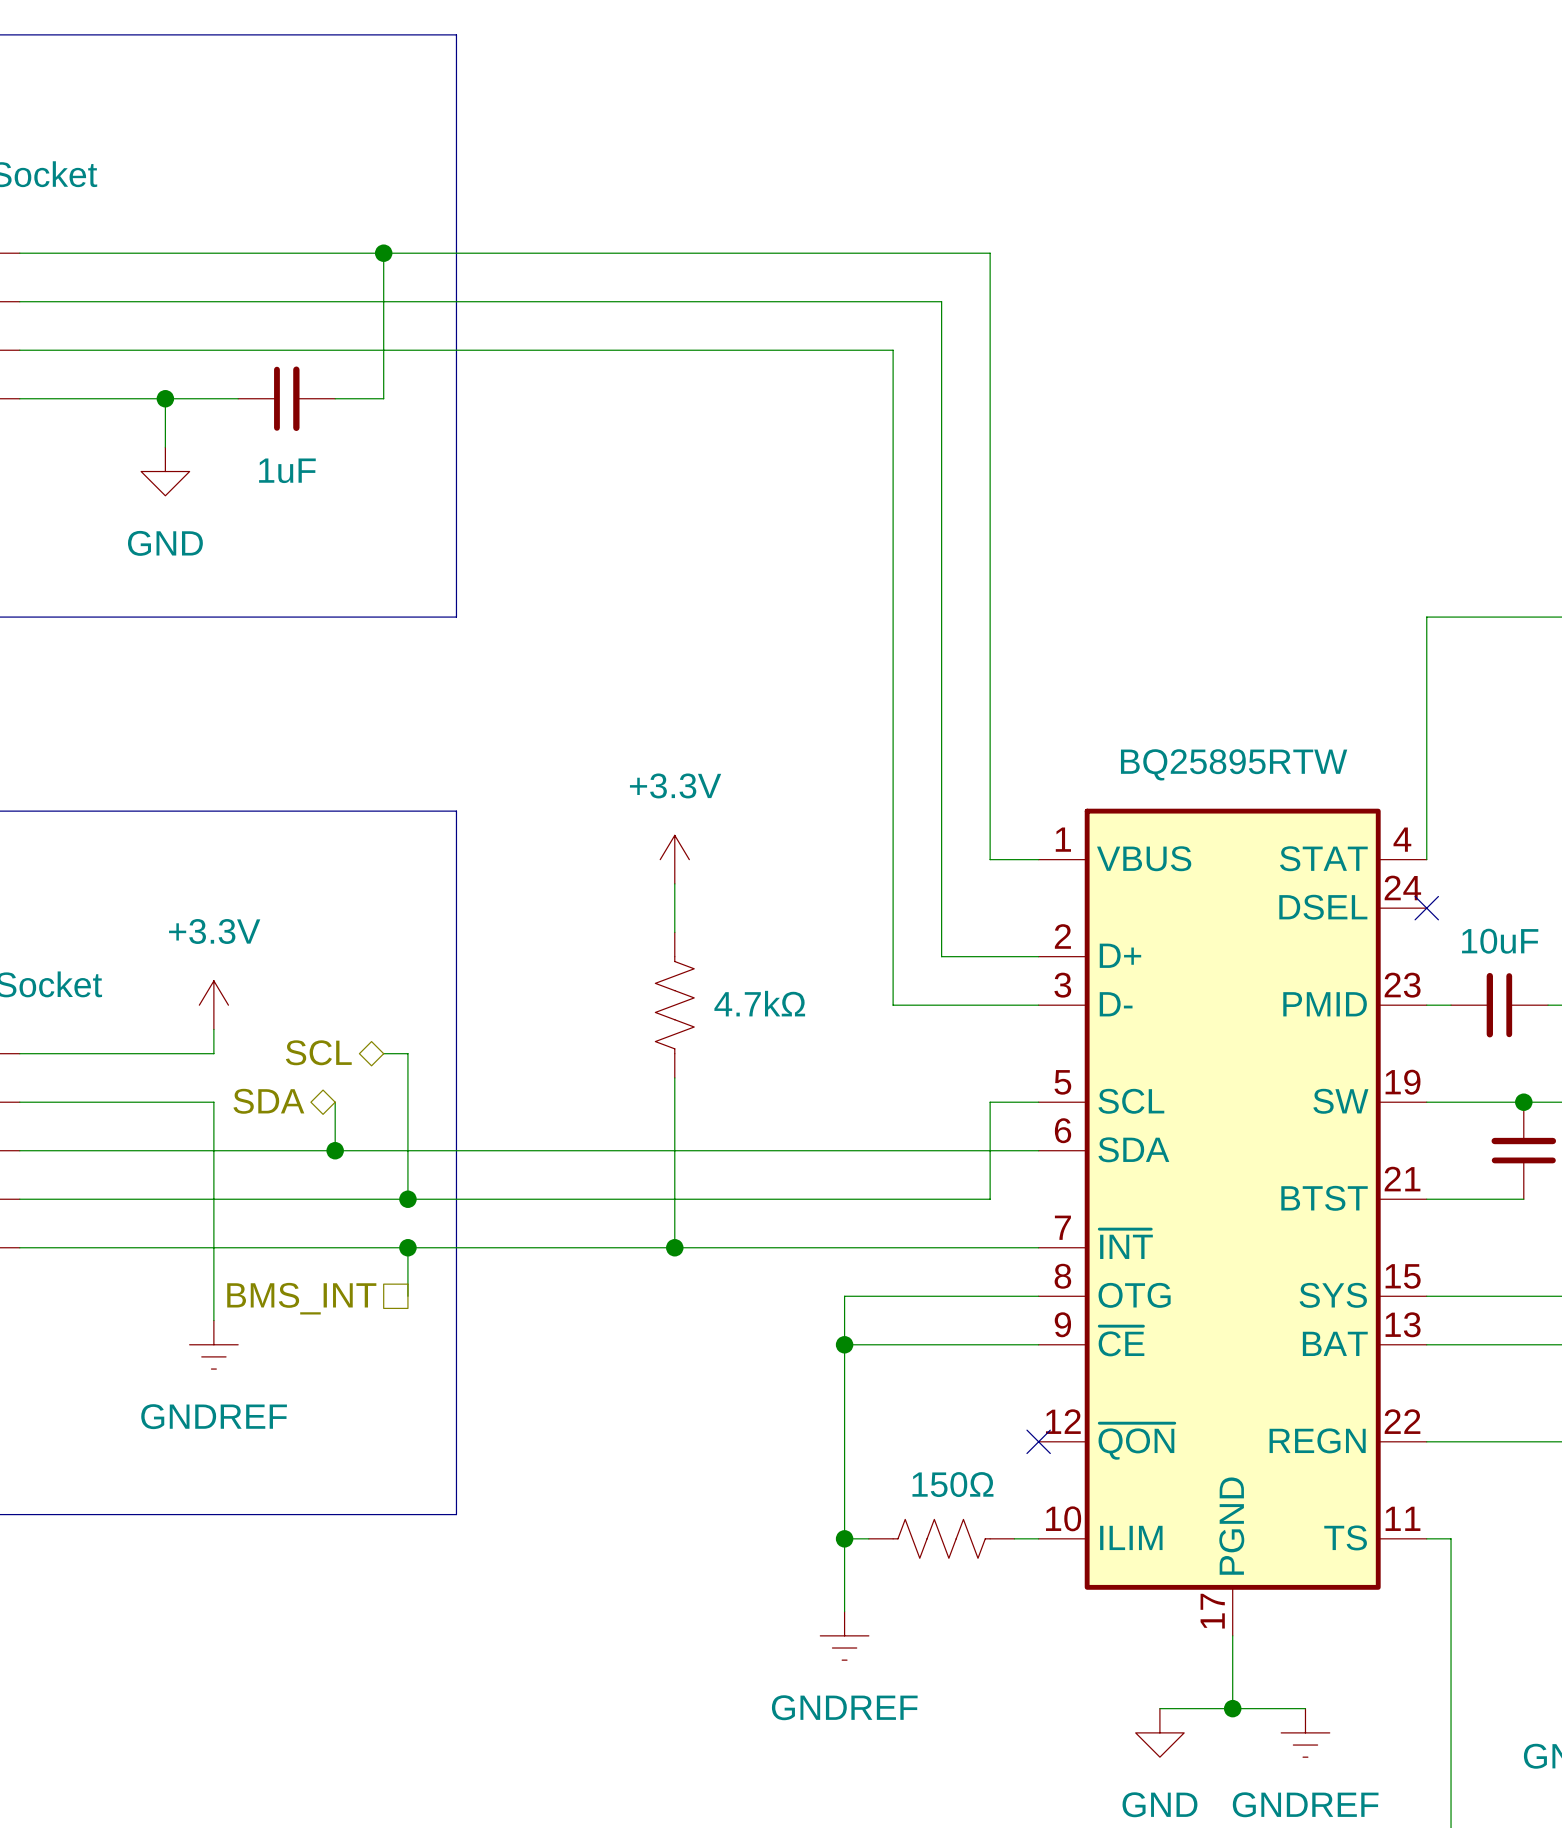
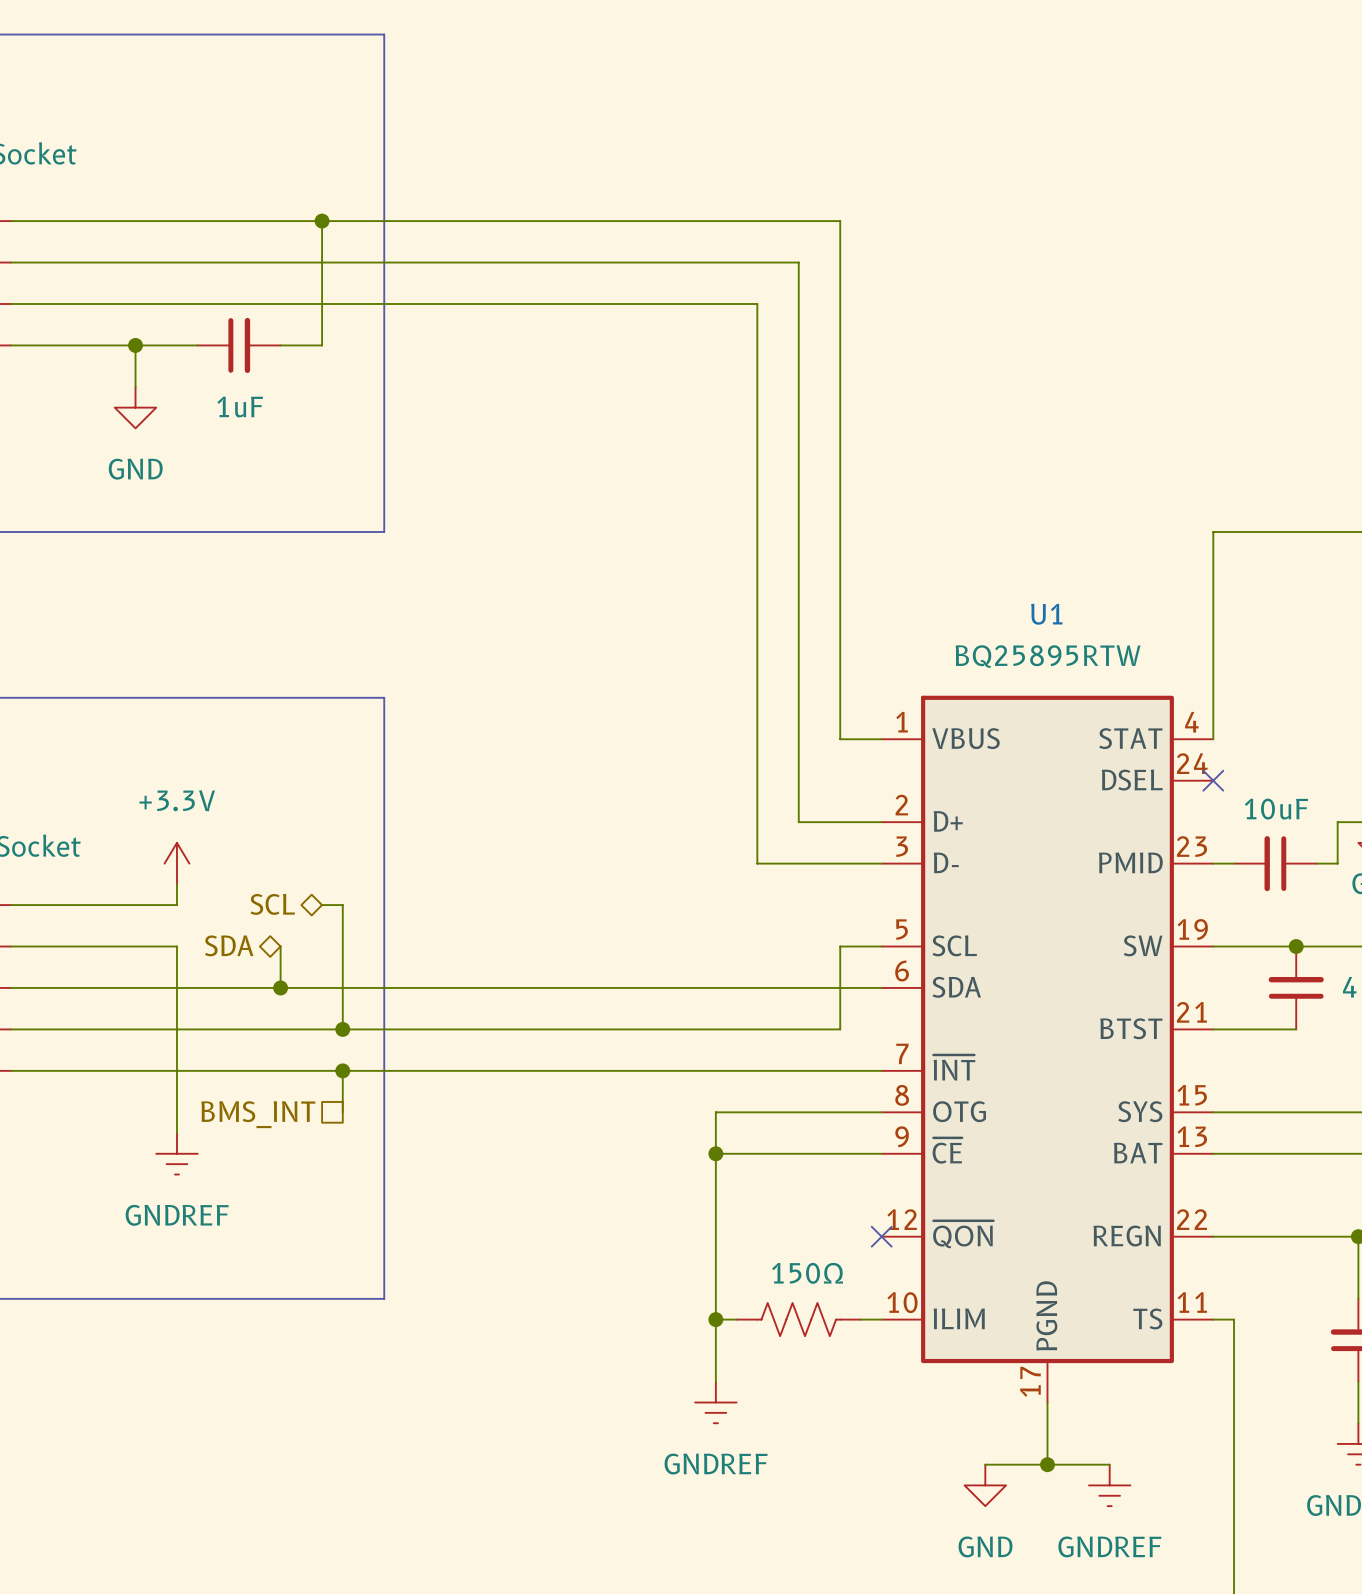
U1 name: none -> U1 (1046, 614)
power symbol: +3.3V (674, 859) -> none
wire: (674, 883) (674, 932) -> none
part: 4.7kΩ (674, 1005) -> none
wire: (674, 1077) (674, 1247) -> none
junction: (674, 1247) -> none

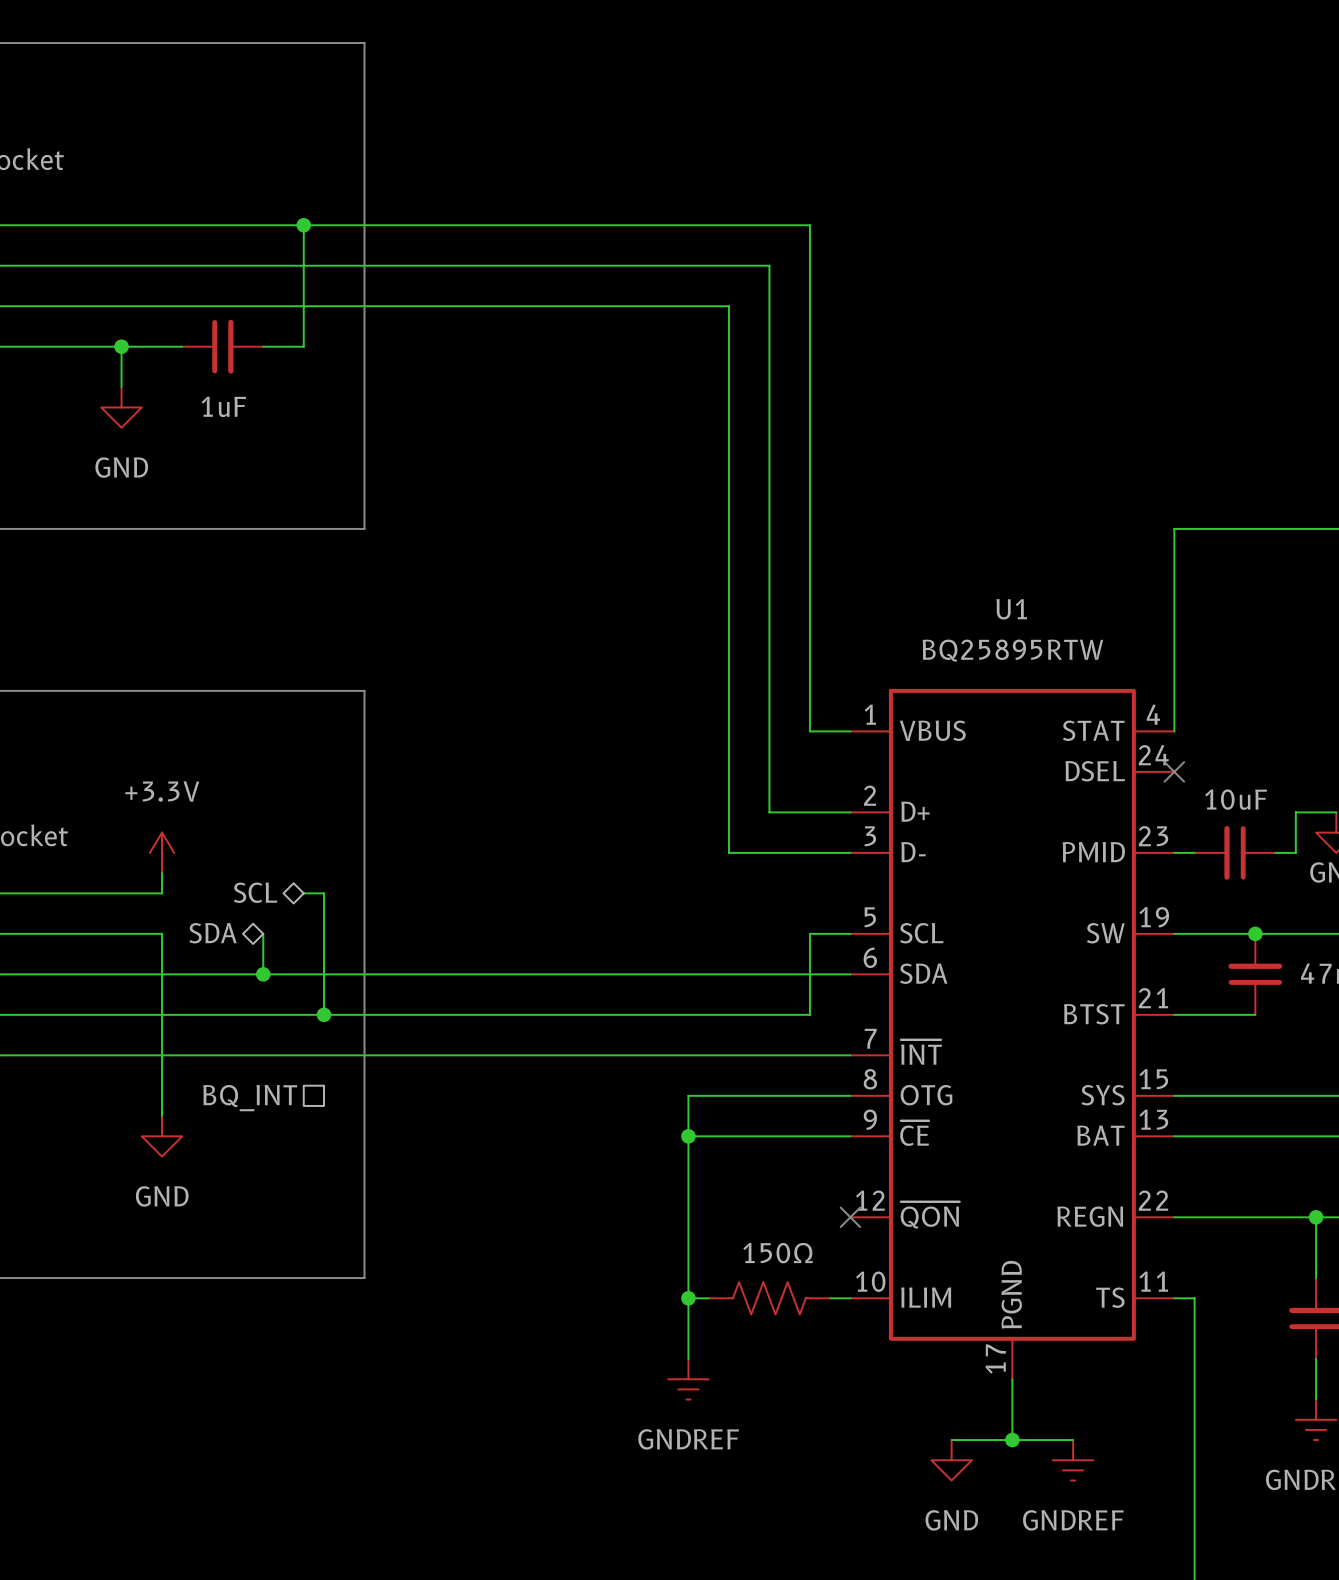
wire: (342, 1070) (342, 1112) -> none
junction: (342, 1070) -> none
hierarchical label: BMS_INT (258, 1114) -> BQ_INT (250, 1098)
power symbol: GNDREF (176, 1153) -> GND (162, 1136)

